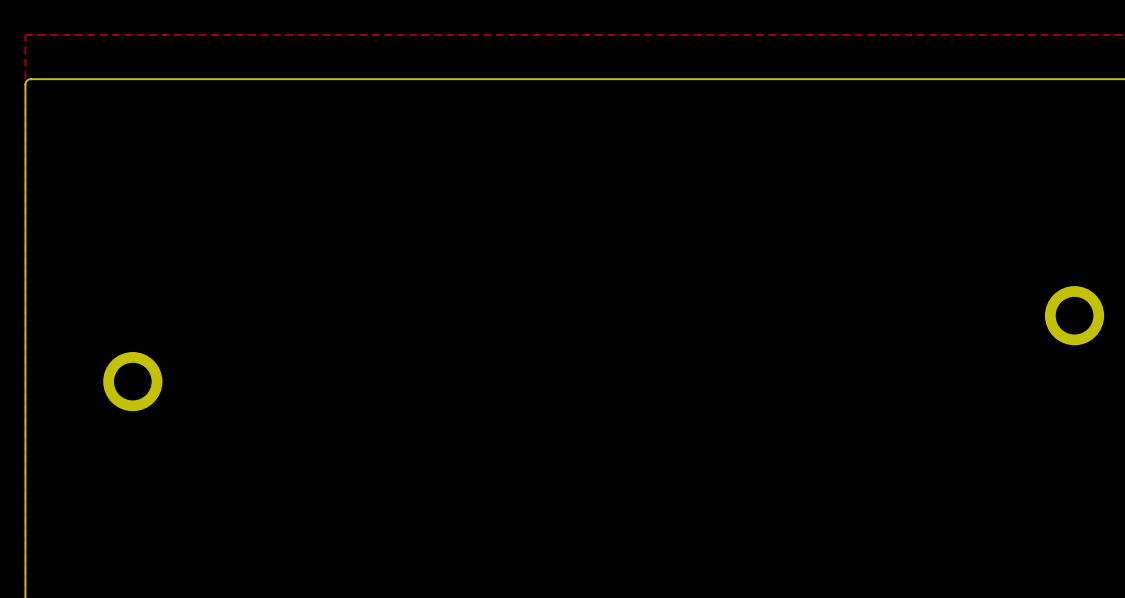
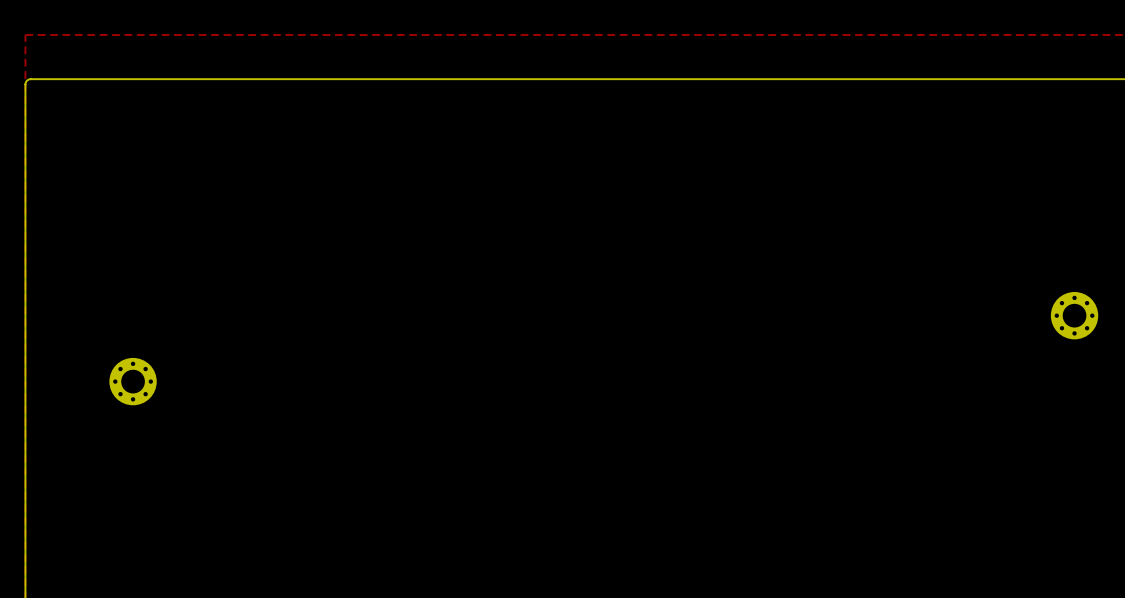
part footprint: [1044, 286, 1105, 346] -> [1050, 292, 1099, 340]
part footprint: [103, 352, 163, 412] -> [109, 357, 157, 406]

